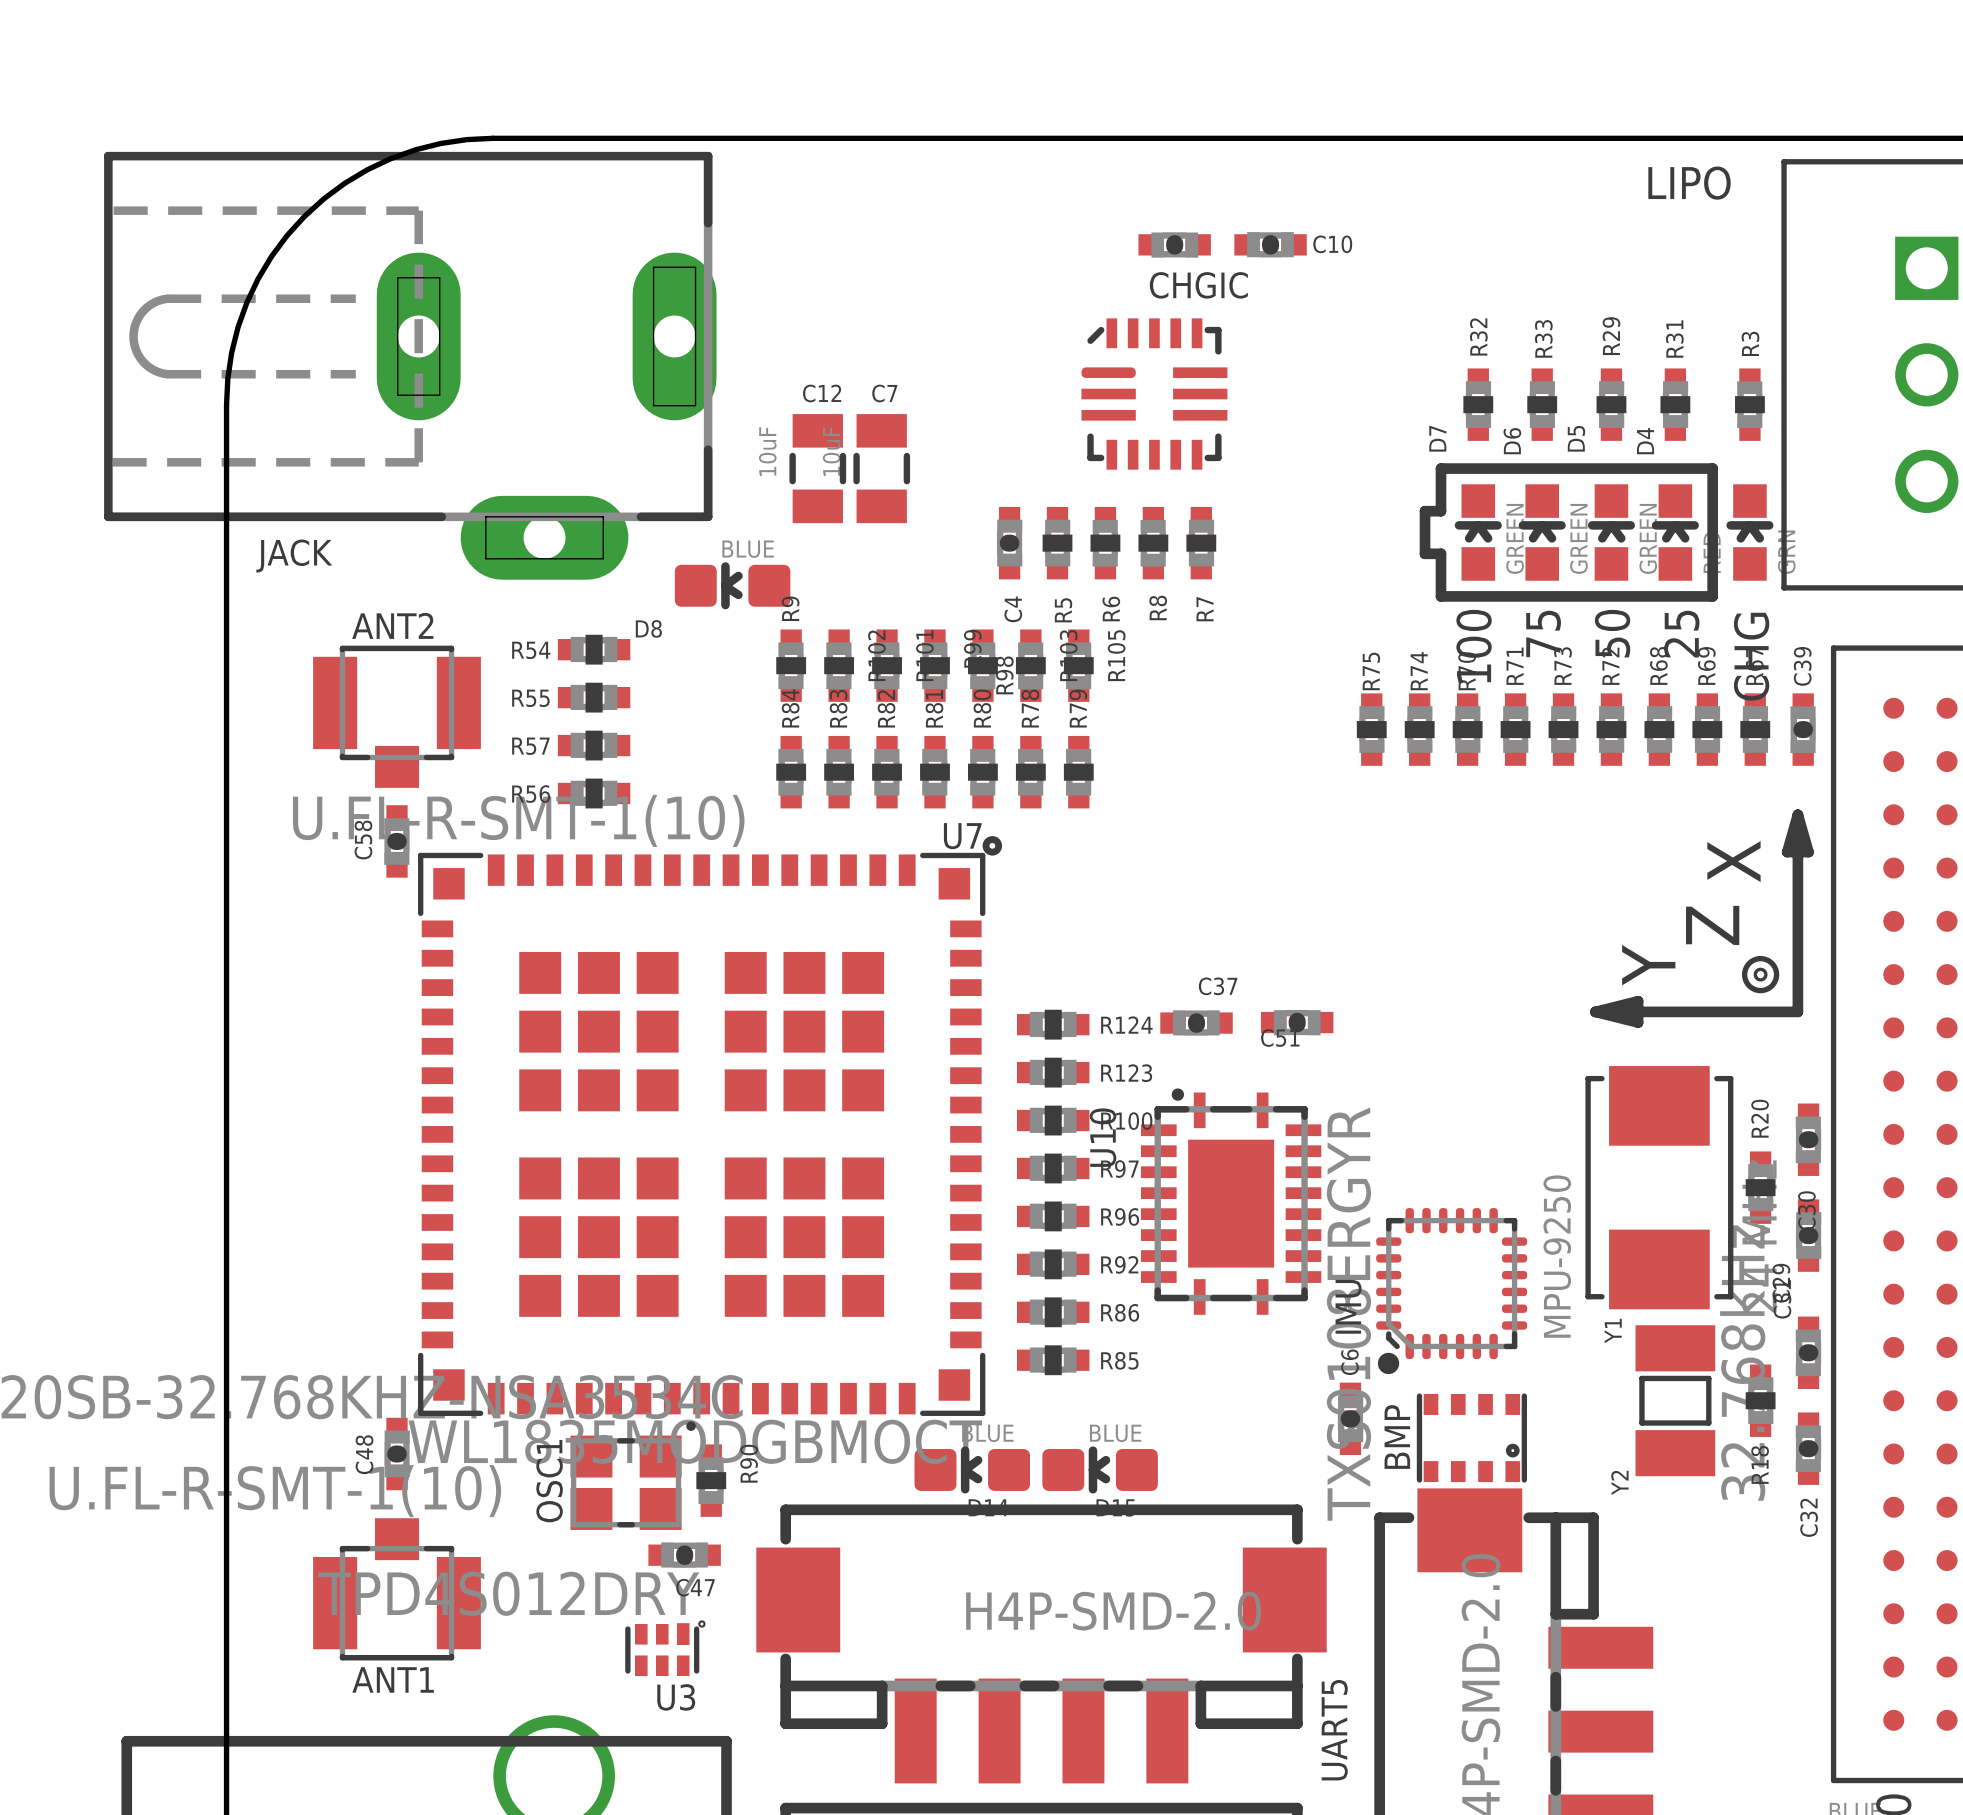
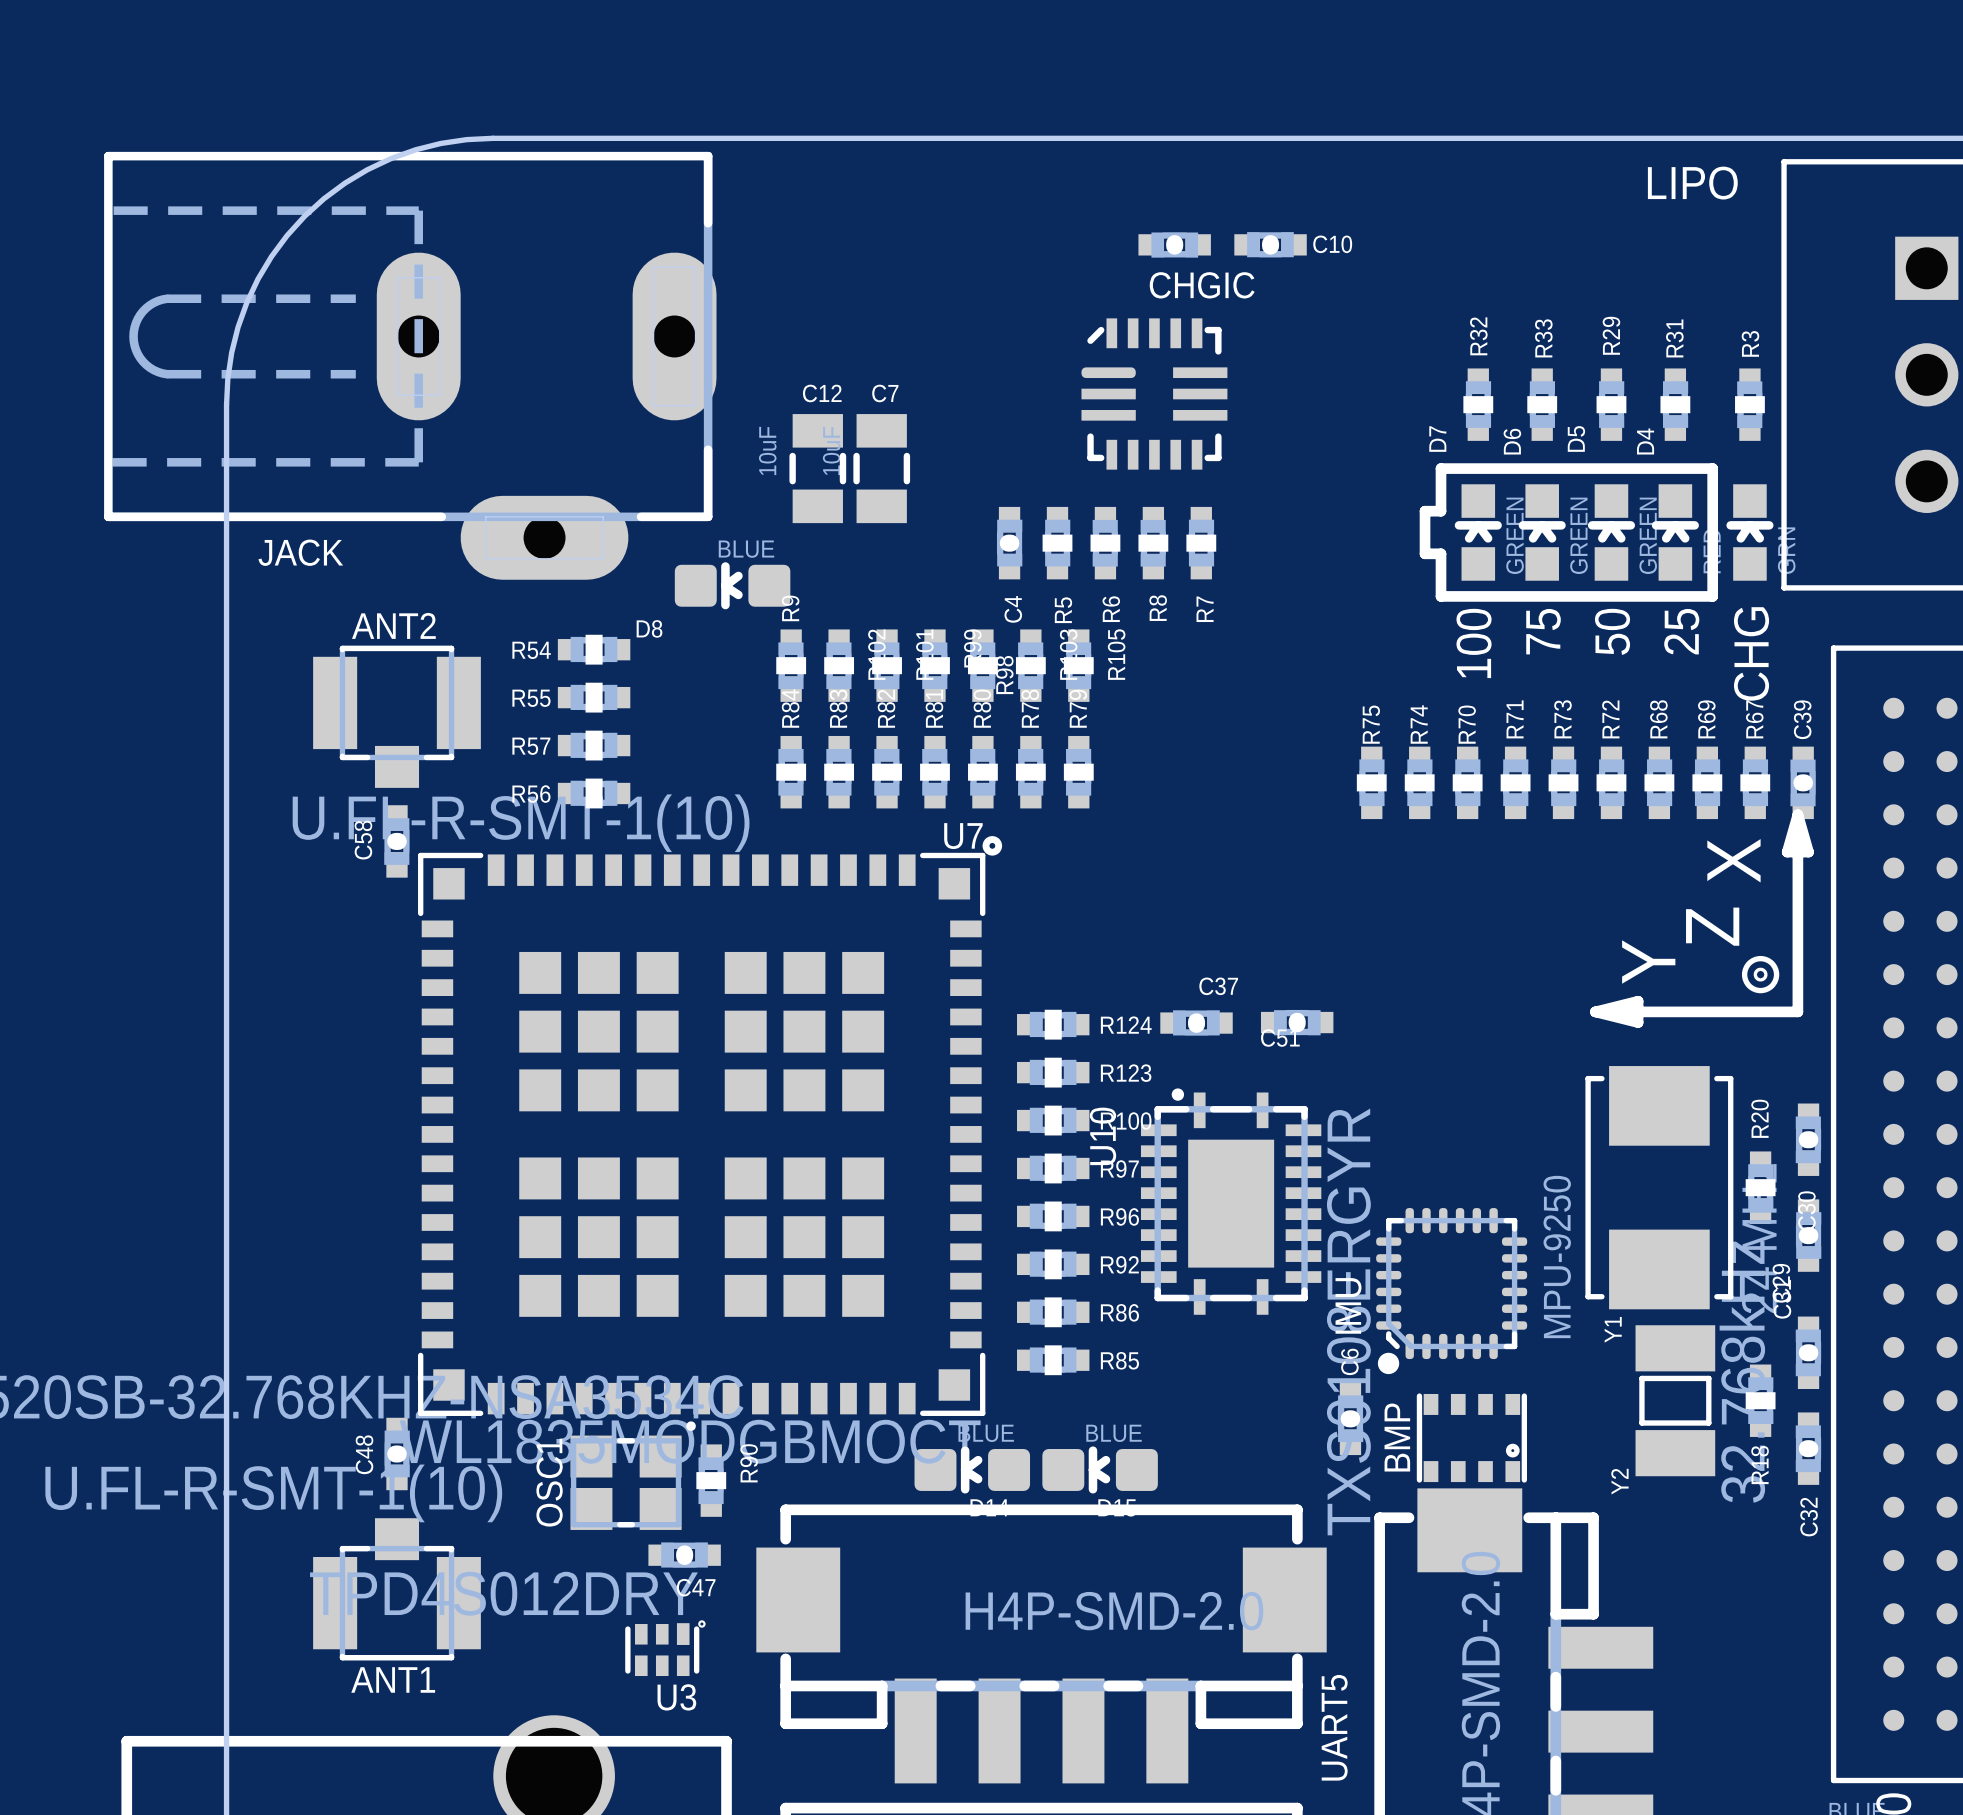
R75 position: (1371, 729) -> (1371, 782)
R74 position: (1419, 729) -> (1419, 782)
R70 position: (1467, 729) -> (1467, 782)
R71 position: (1515, 729) -> (1515, 782)
R73 position: (1563, 729) -> (1563, 782)
R72 position: (1611, 729) -> (1611, 782)
R68 position: (1659, 729) -> (1659, 782)
R69 position: (1707, 729) -> (1707, 782)
R67 position: (1755, 729) -> (1755, 782)
C39 position: (1803, 729) -> (1803, 782)

